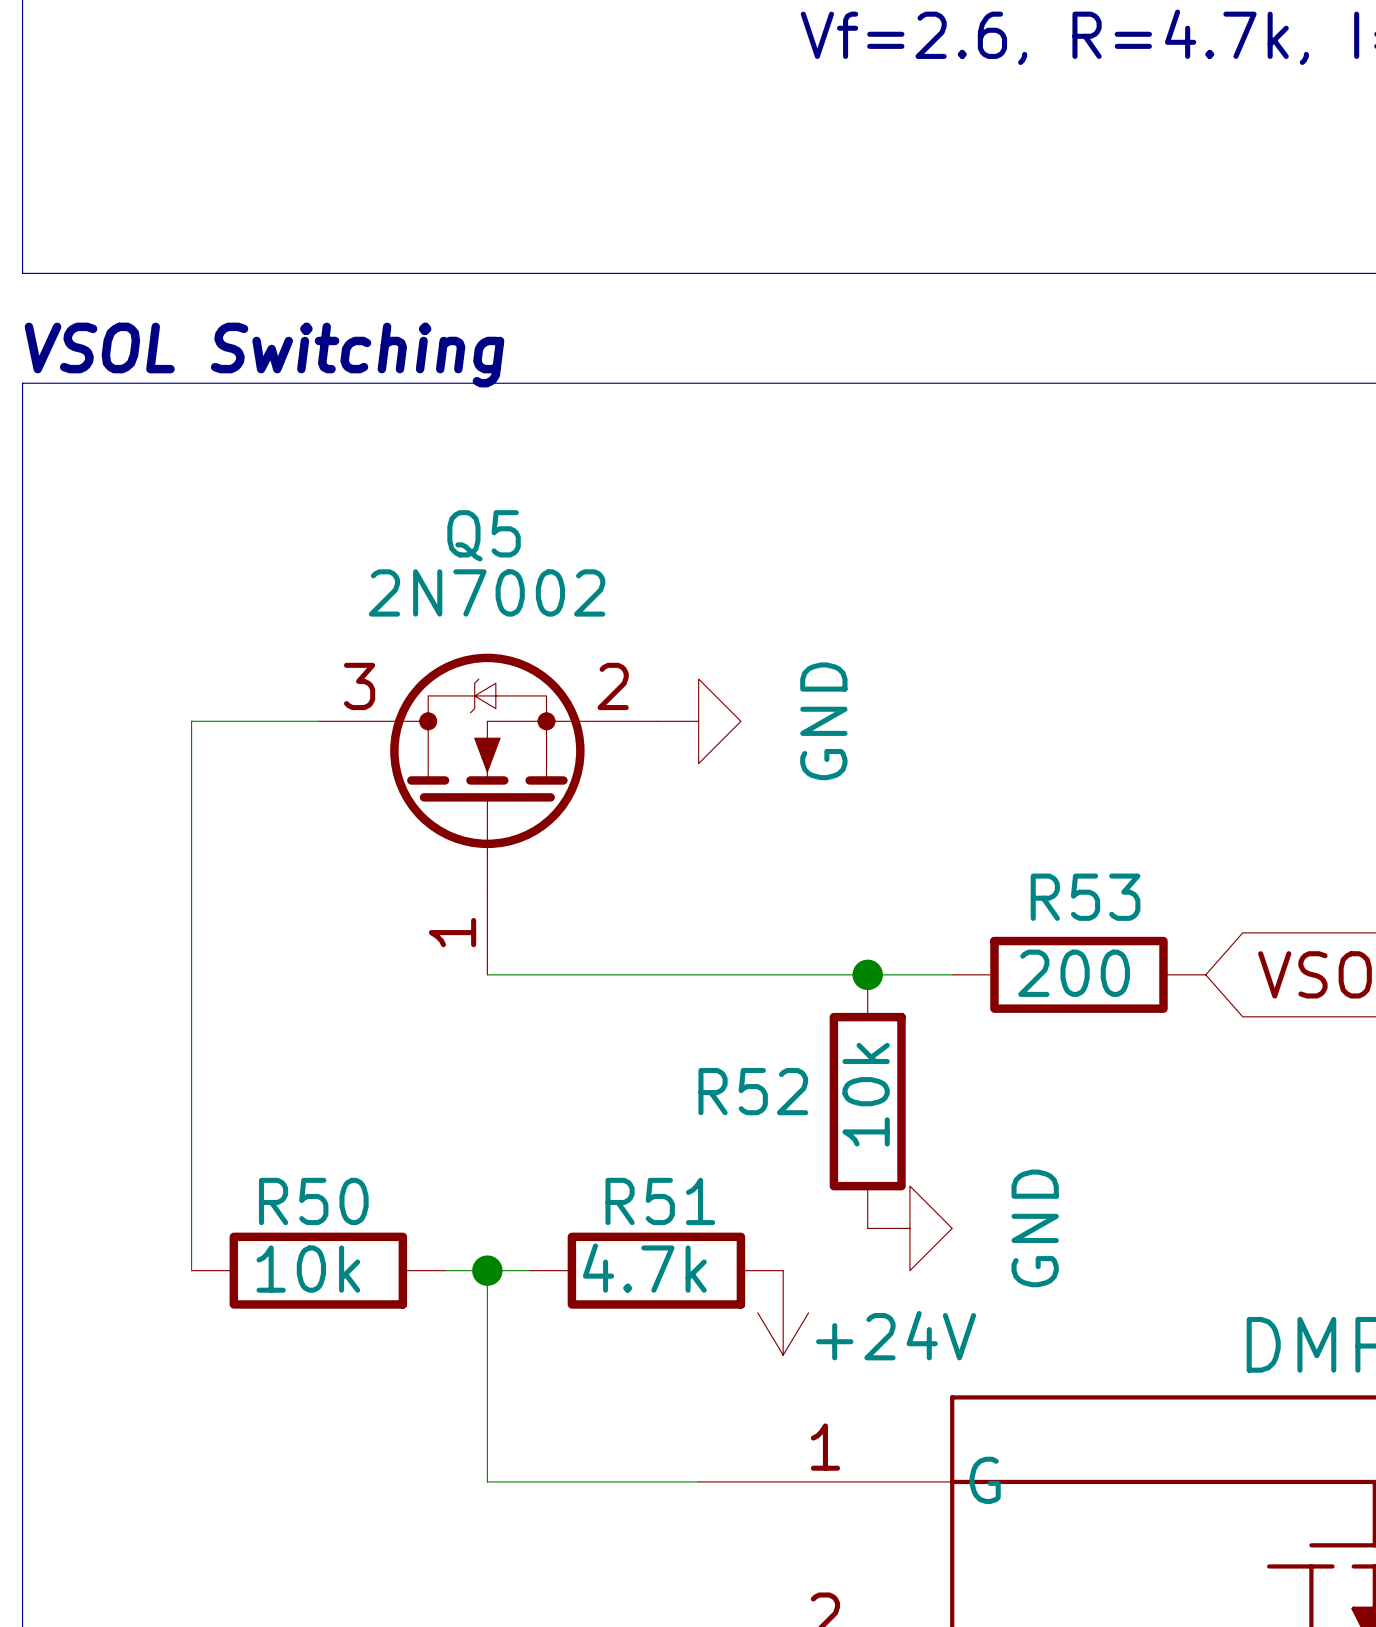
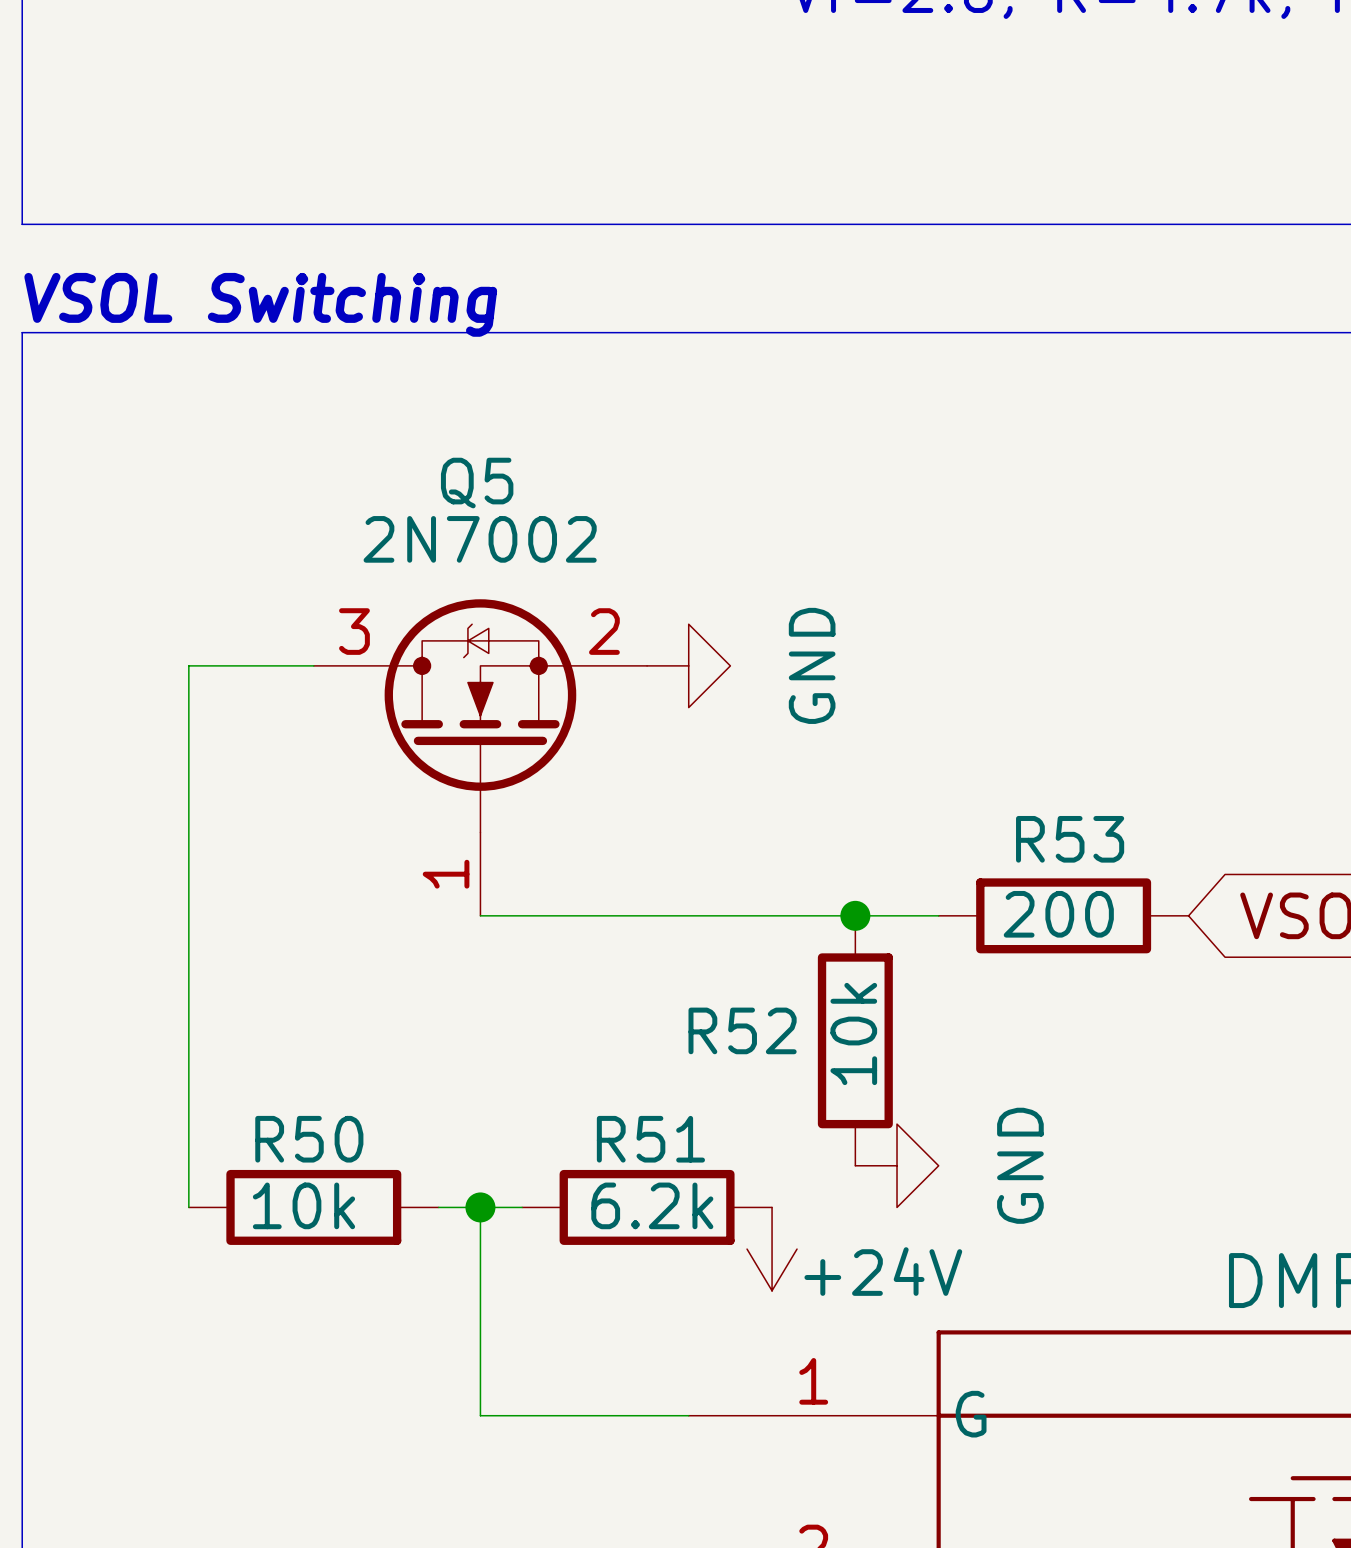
R51 value: 4.7k (644, 1268) -> 6.2k (652, 1205)

